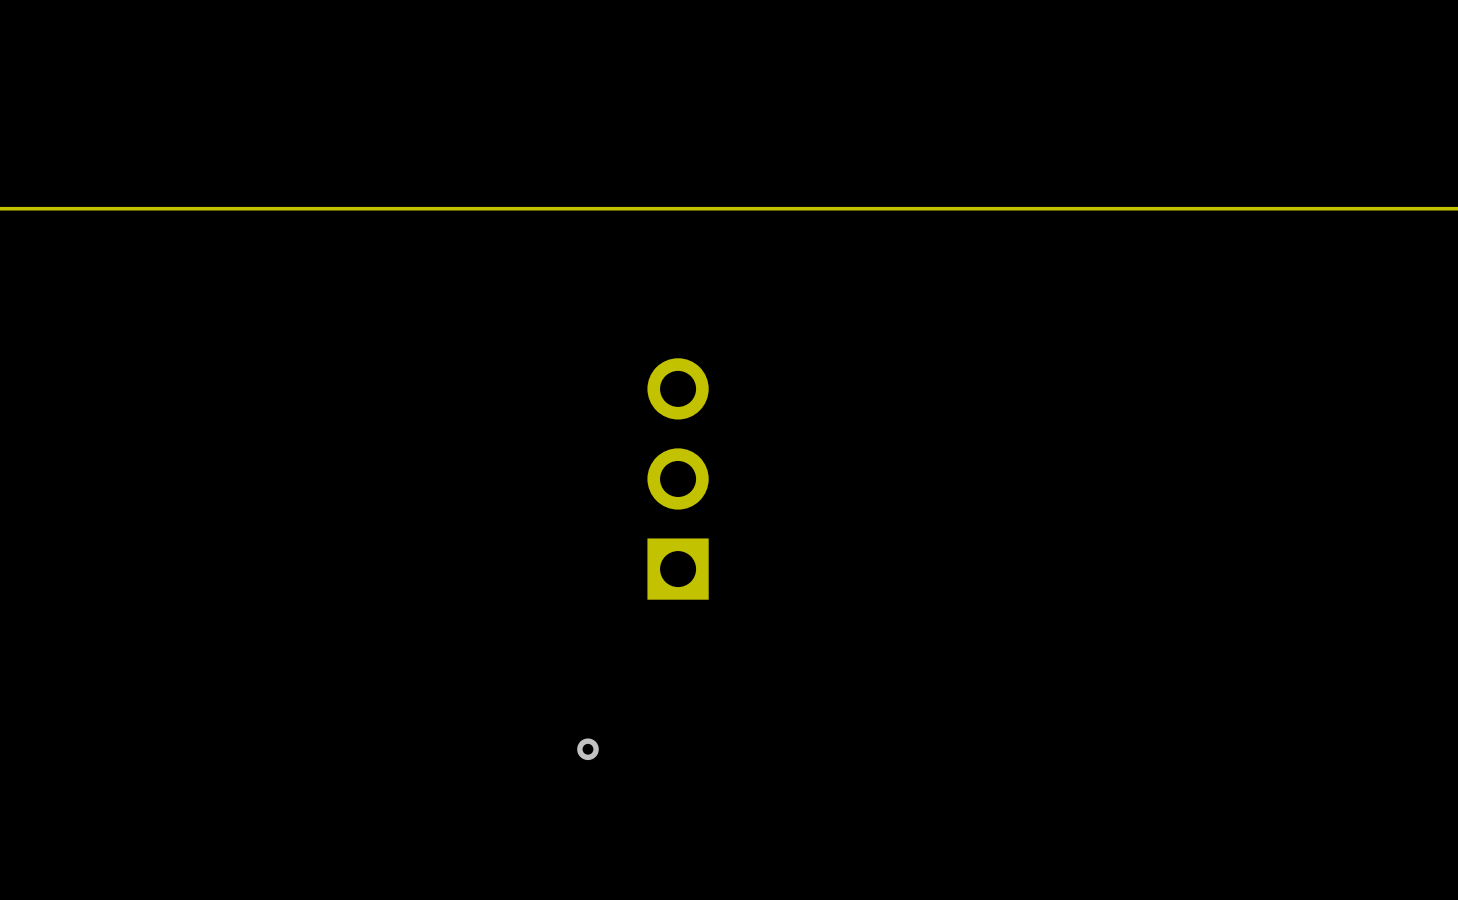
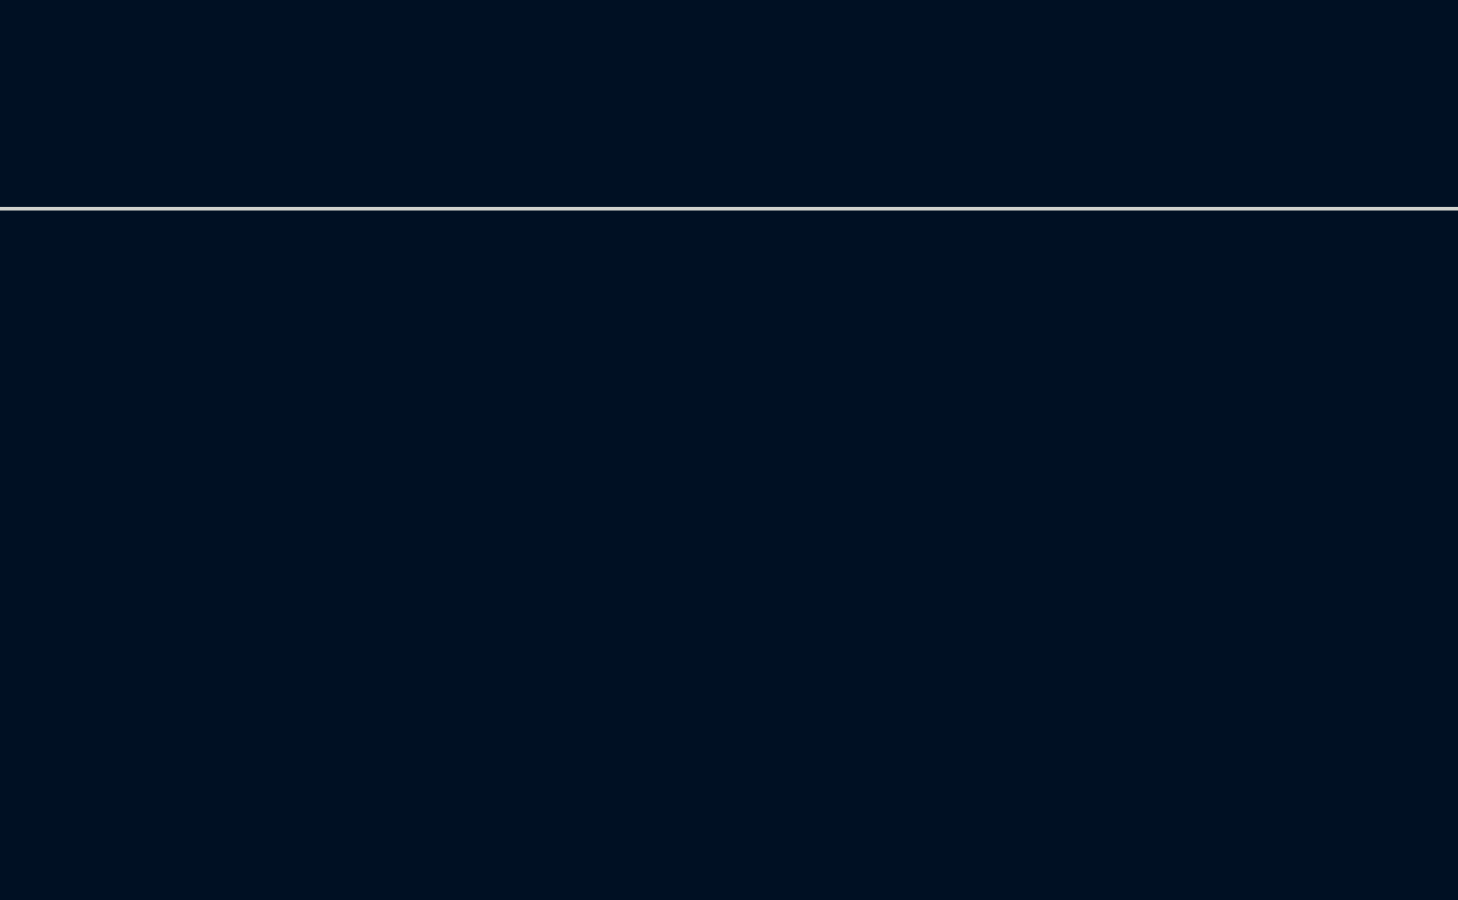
part: (678, 478) -> none
via: (587, 749) -> none

